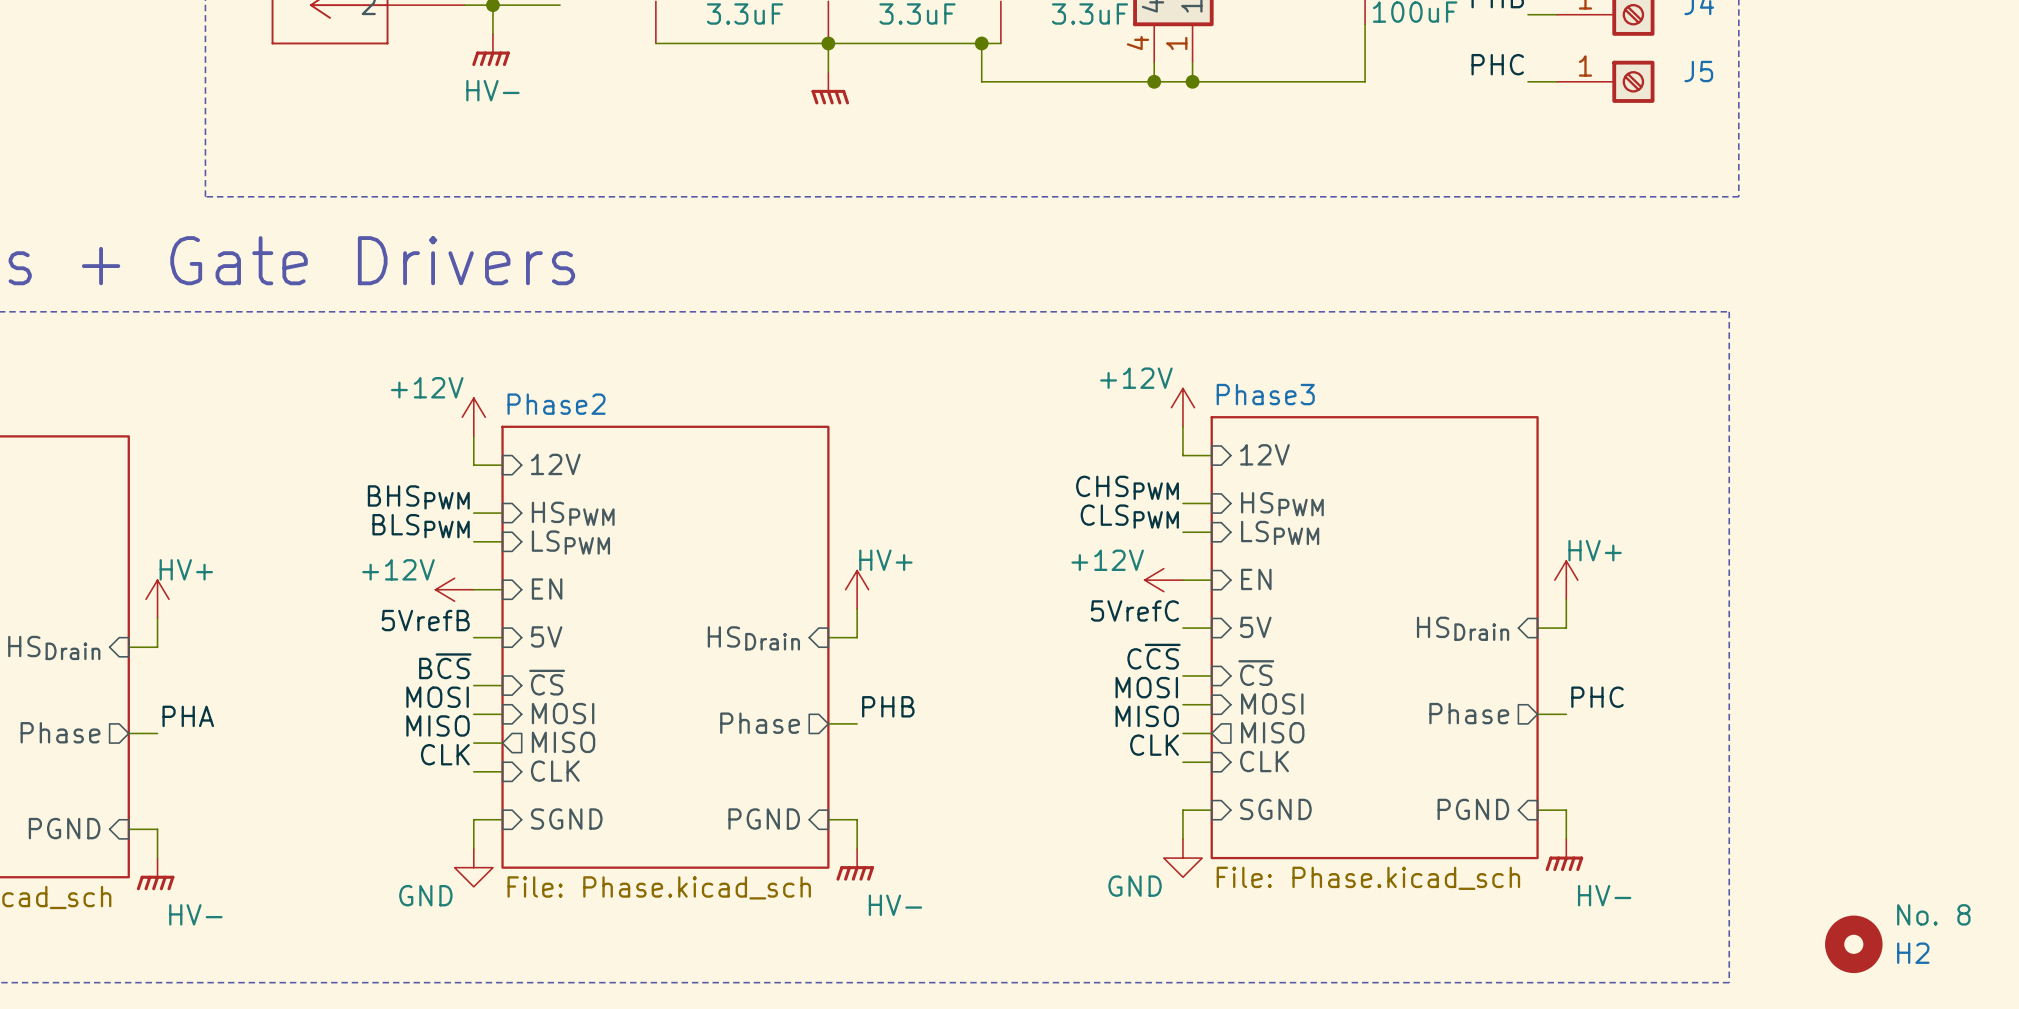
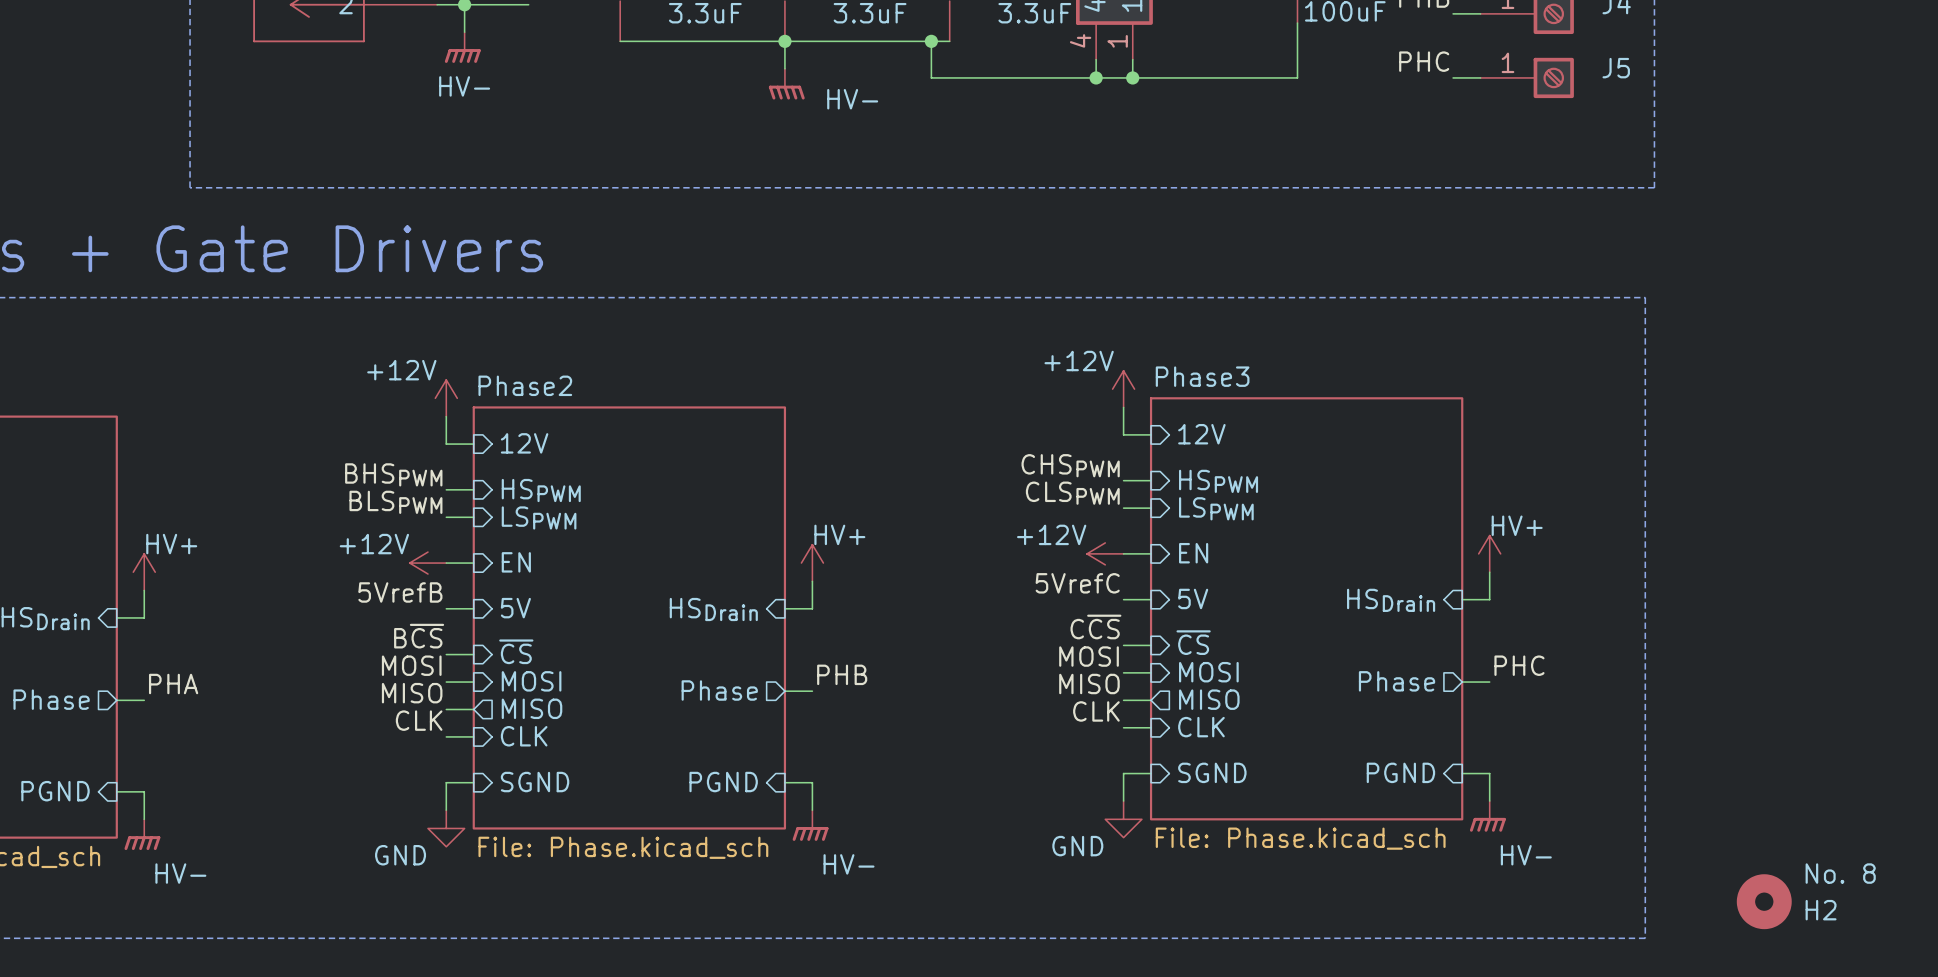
power symbol text: none -> HV- (852, 99)

